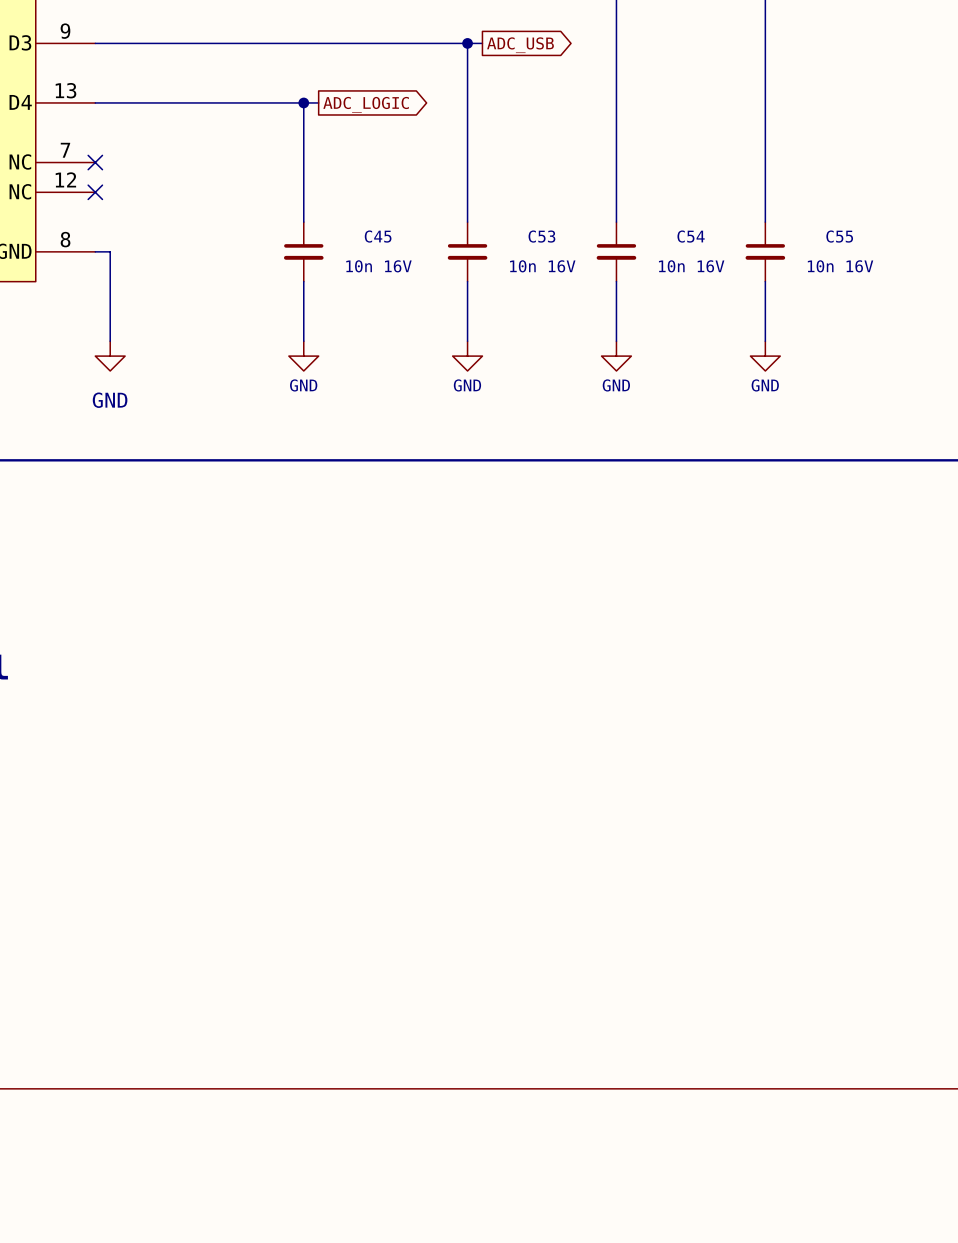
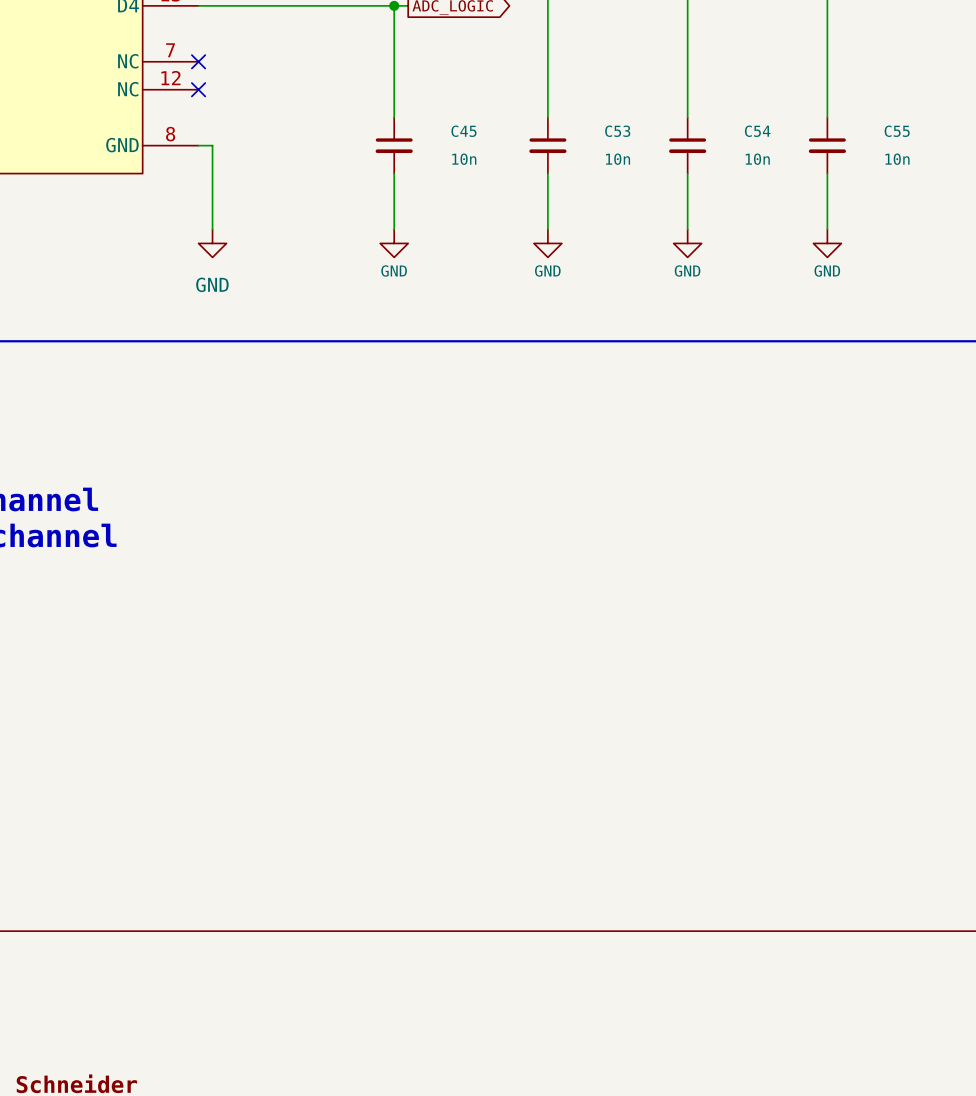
C45 value: 10n 16V (378, 266) -> 10n (464, 159)
C53 value: 10n 16V (542, 266) -> 10n (618, 159)
C54 value: 10n 16V (691, 266) -> 10n (757, 159)
C55 value: 10n 16V (840, 266) -> 10n (897, 159)

